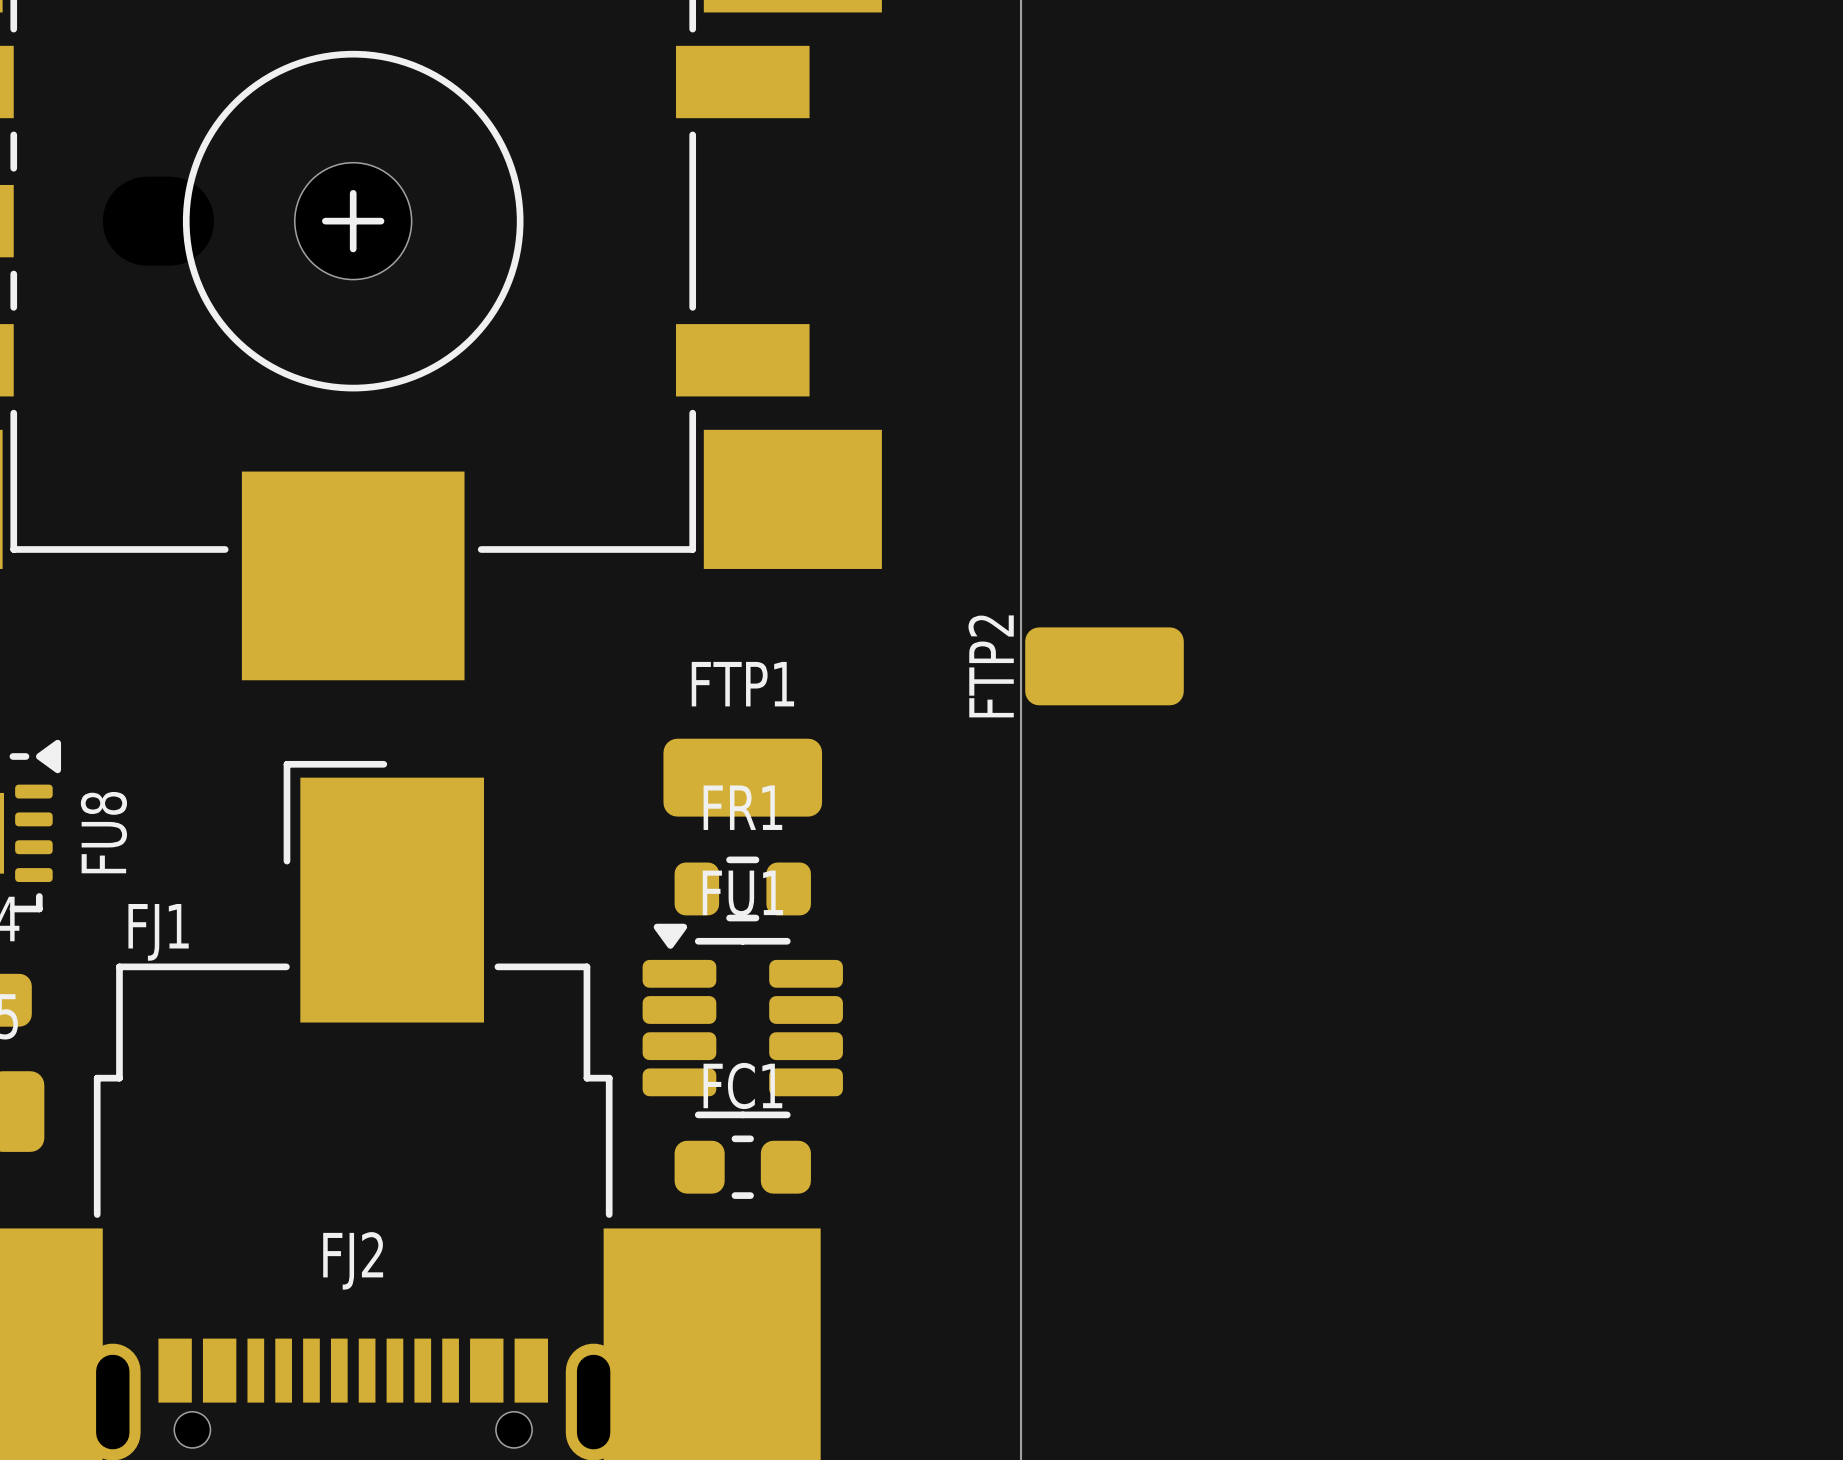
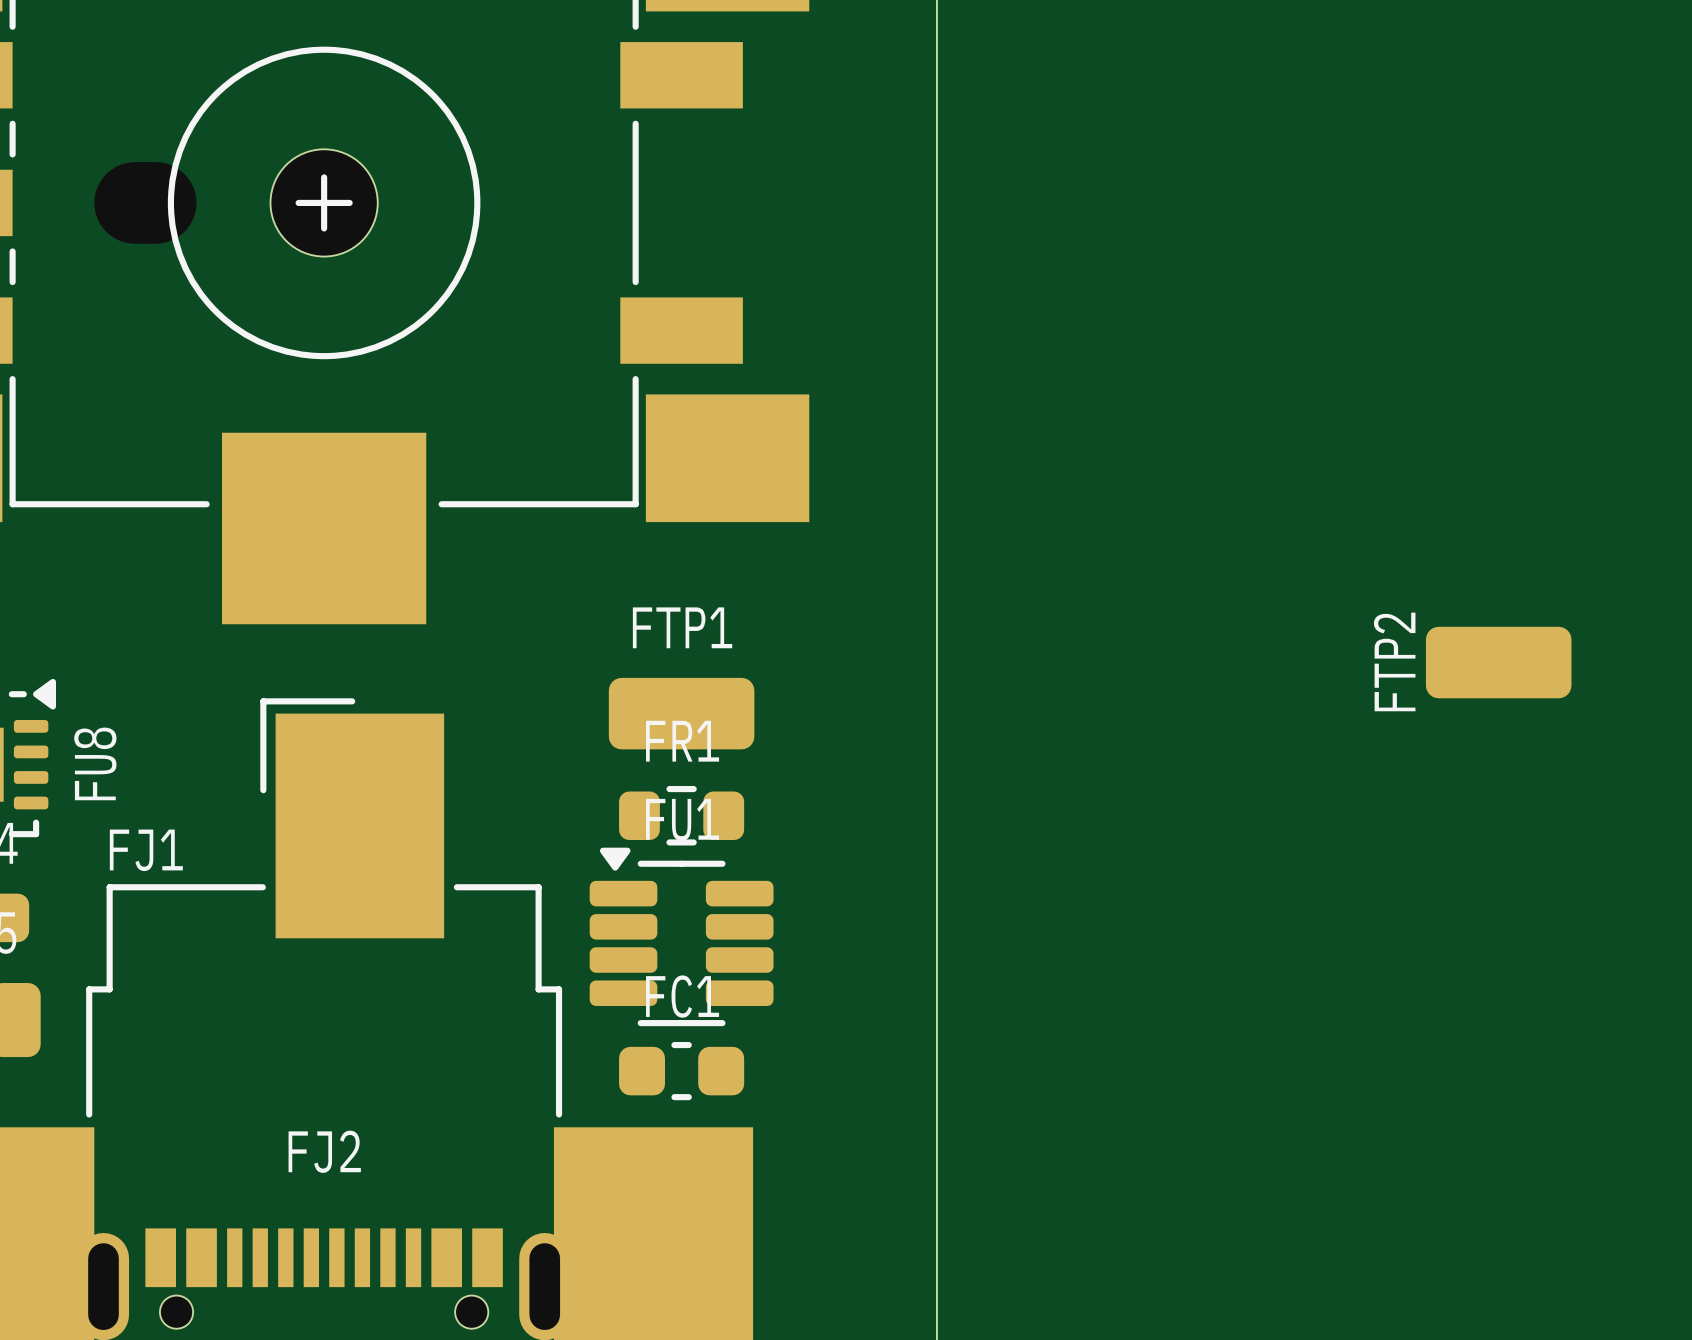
FTP2 position: (1104, 666) -> (1498, 662)

